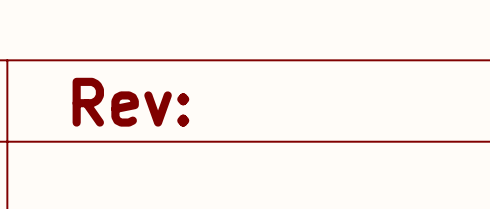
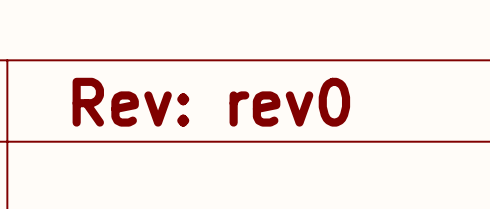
title block: Rev: (130, 102) -> Rev: rev0 (211, 102)

